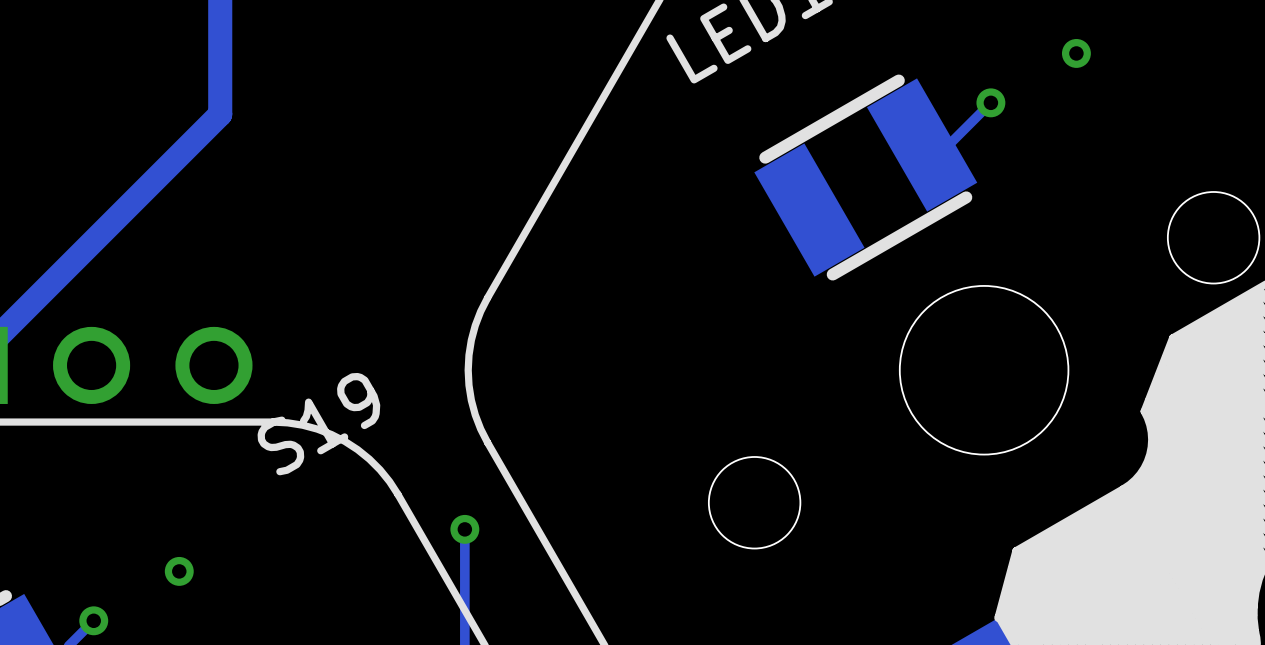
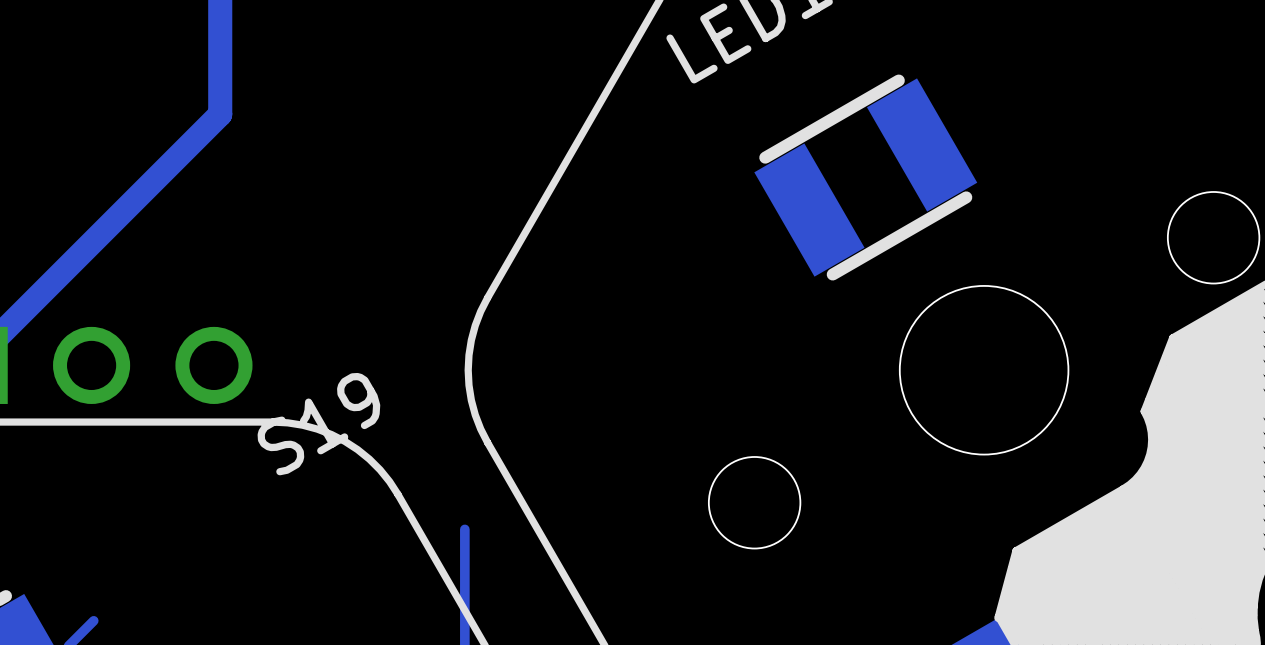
via: (1076, 53) -> none
track: (990, 102) (948, 145) (922, 145) -> none
via: (990, 102) -> none
via: (464, 529) -> none
via: (179, 571) -> none
via: (93, 620) -> none

